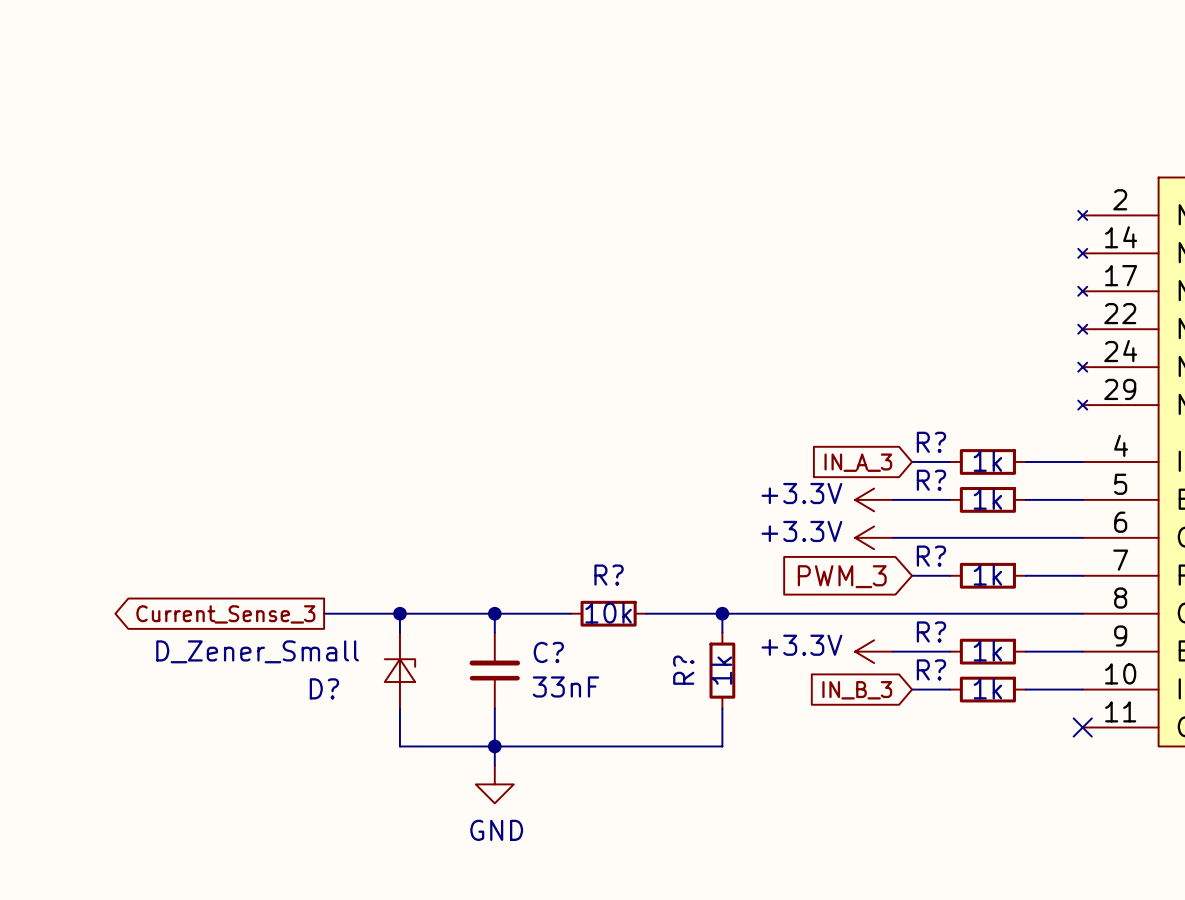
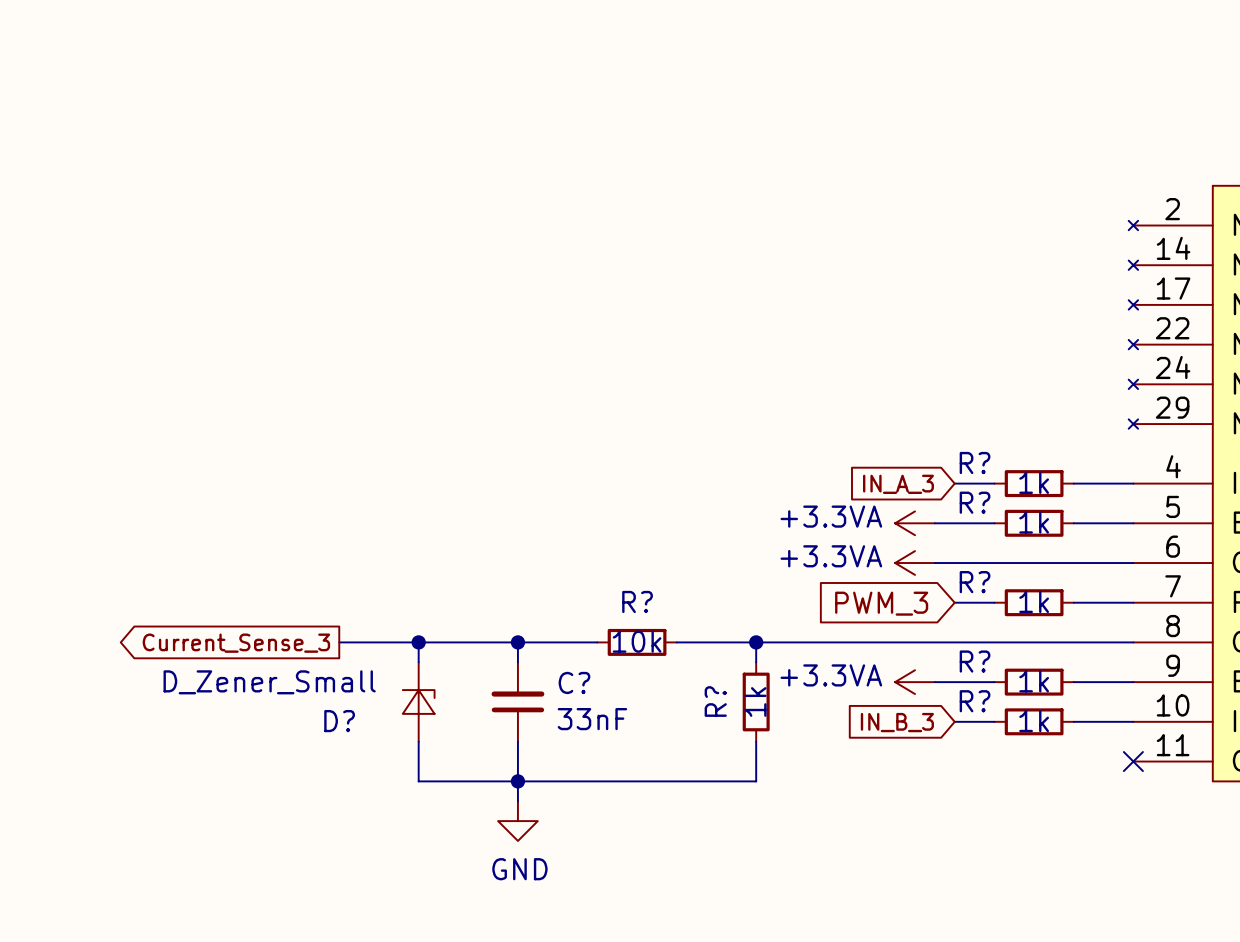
power symbol: +3.3V (874, 499) -> +3.3VA (915, 523)
power symbol: +3.3V (874, 537) -> +3.3VA (915, 563)
power symbol: +3.3V (874, 651) -> +3.3VA (915, 682)

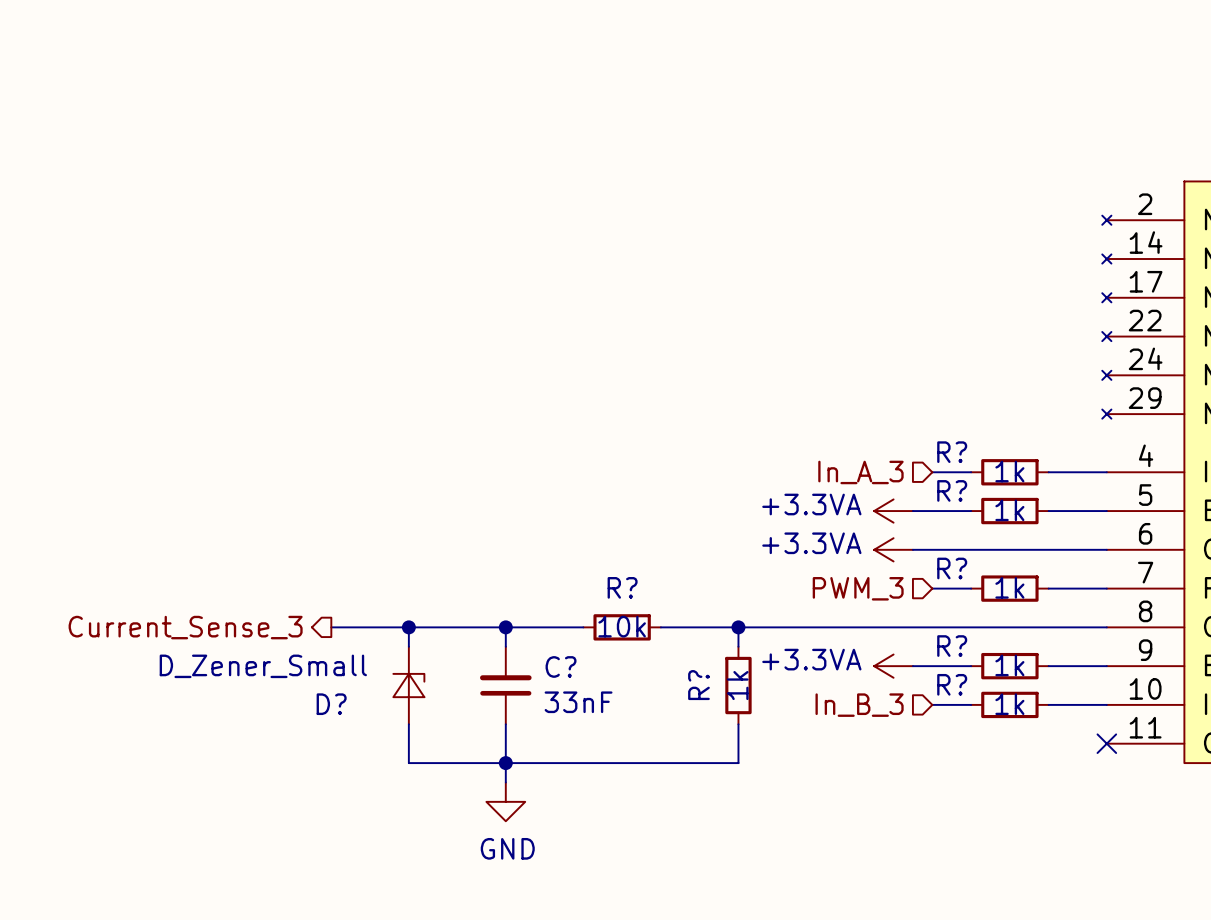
hierarchical label: none -> In_A_3 (860, 472)
global label: IN_A_3 (898, 484) -> none
hierarchical label: none -> PWM_3 (858, 588)
global label: PWM_3 (881, 603) -> none
hierarchical label: none -> Current_Sense_3 (185, 627)
global label: Current_Sense_3 (236, 643) -> none
hierarchical label: none -> In_B_3 (859, 705)
global label: IN_B_3 (897, 722) -> none

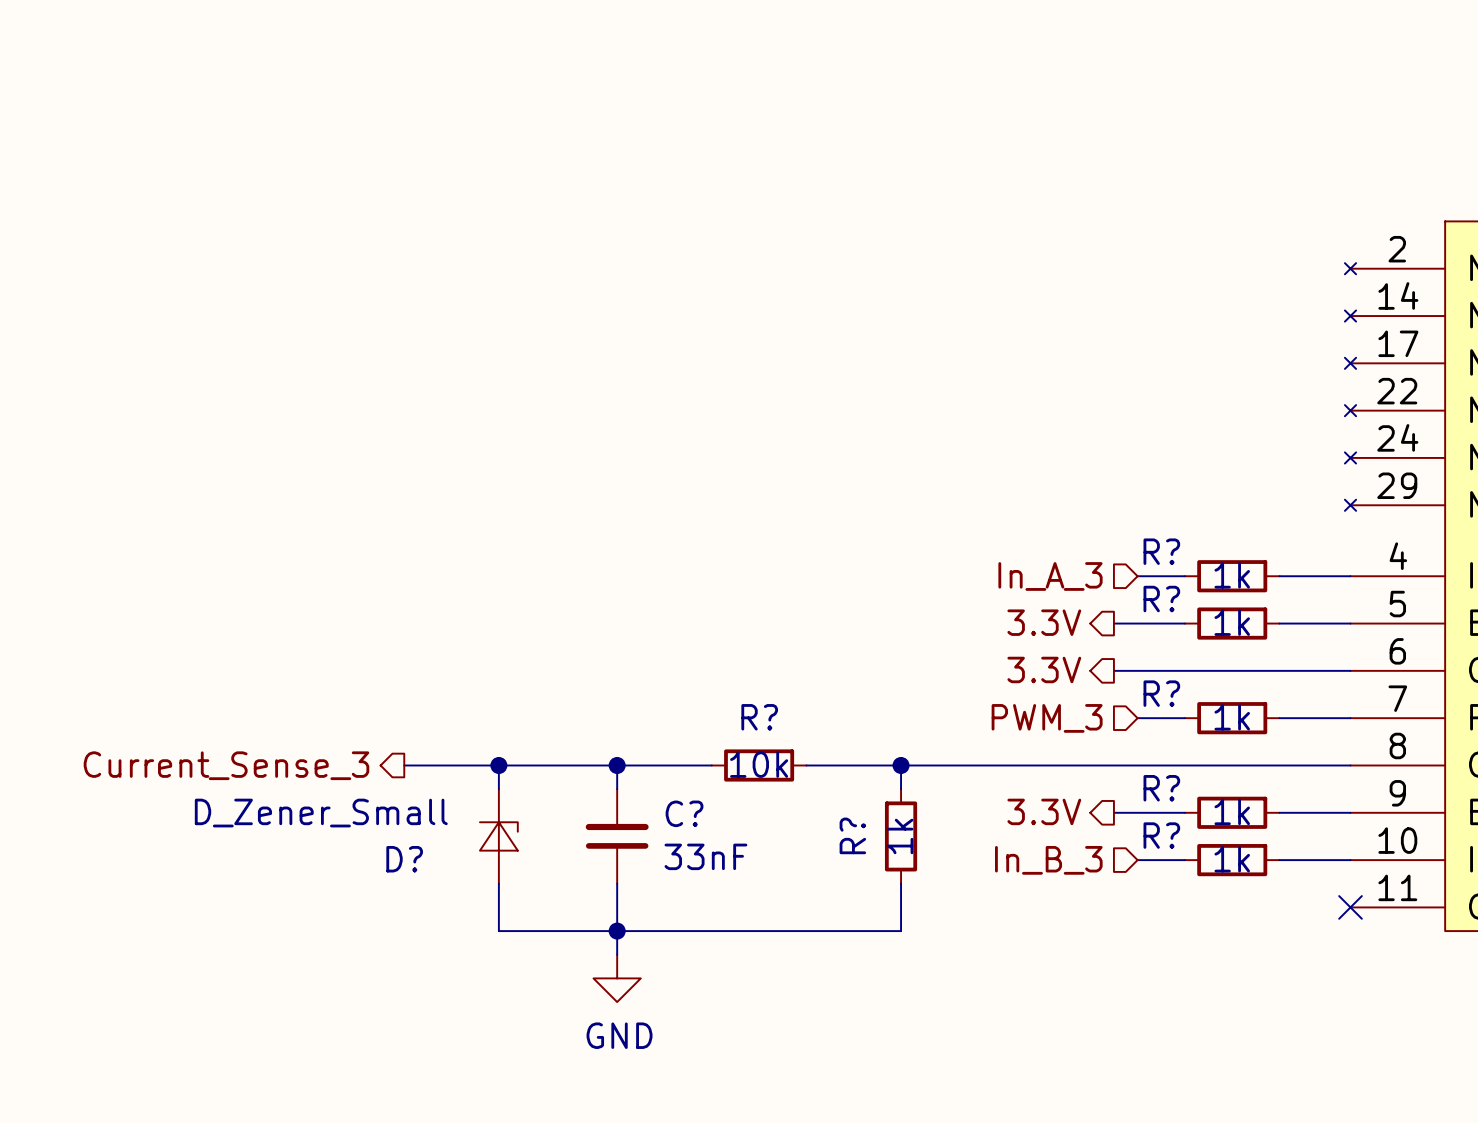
hierarchical label: none -> 3.3V (1044, 622)
power symbol: +3.3VA (893, 511) -> none
hierarchical label: none -> 3.3V (1044, 669)
power symbol: +3.3VA (893, 549) -> none
hierarchical label: none -> 3.3V (1044, 811)
power symbol: +3.3VA (893, 666) -> none

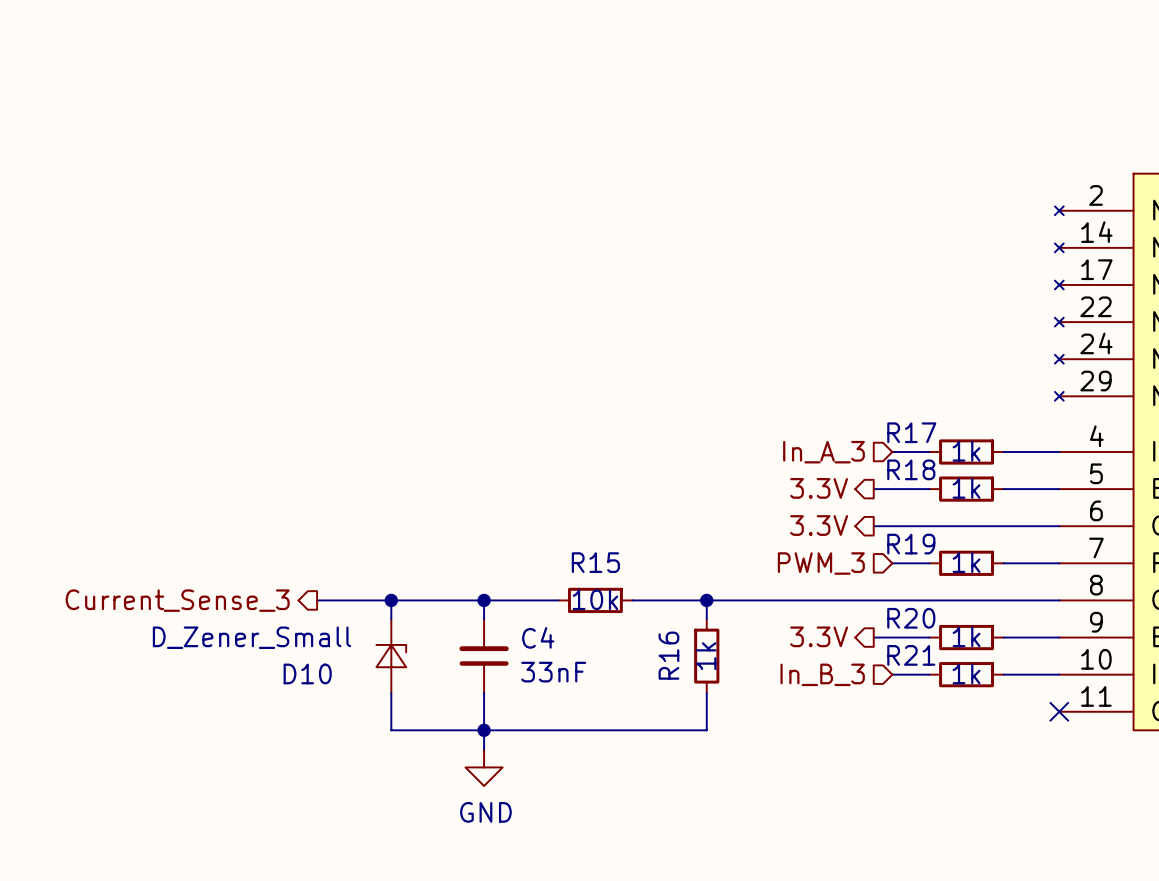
R? name: R? (1161, 551) -> R17 (911, 432)
R? name: R? (1161, 599) -> R18 (911, 469)
R? name: R? (1161, 693) -> R19 (911, 544)
R? name: R? (759, 717) -> R15 (595, 562)
R? name: R? (1161, 788) -> R20 (911, 618)
C? name: C? (684, 813) -> C4 (538, 637)
R? name: R? (852, 835) -> R16 (668, 655)
R? name: R? (1161, 835) -> R21 (911, 655)
D? name: D? (404, 859) -> D10 (307, 673)

